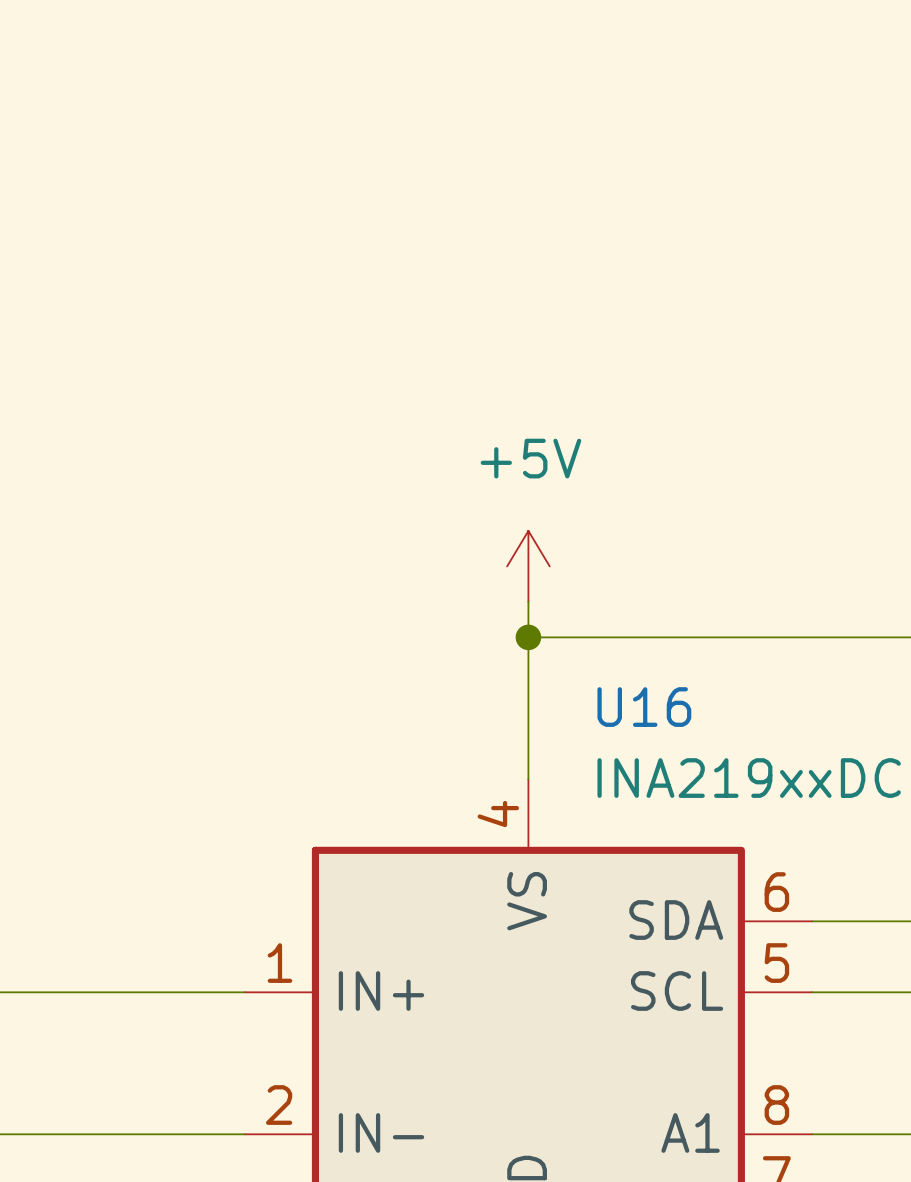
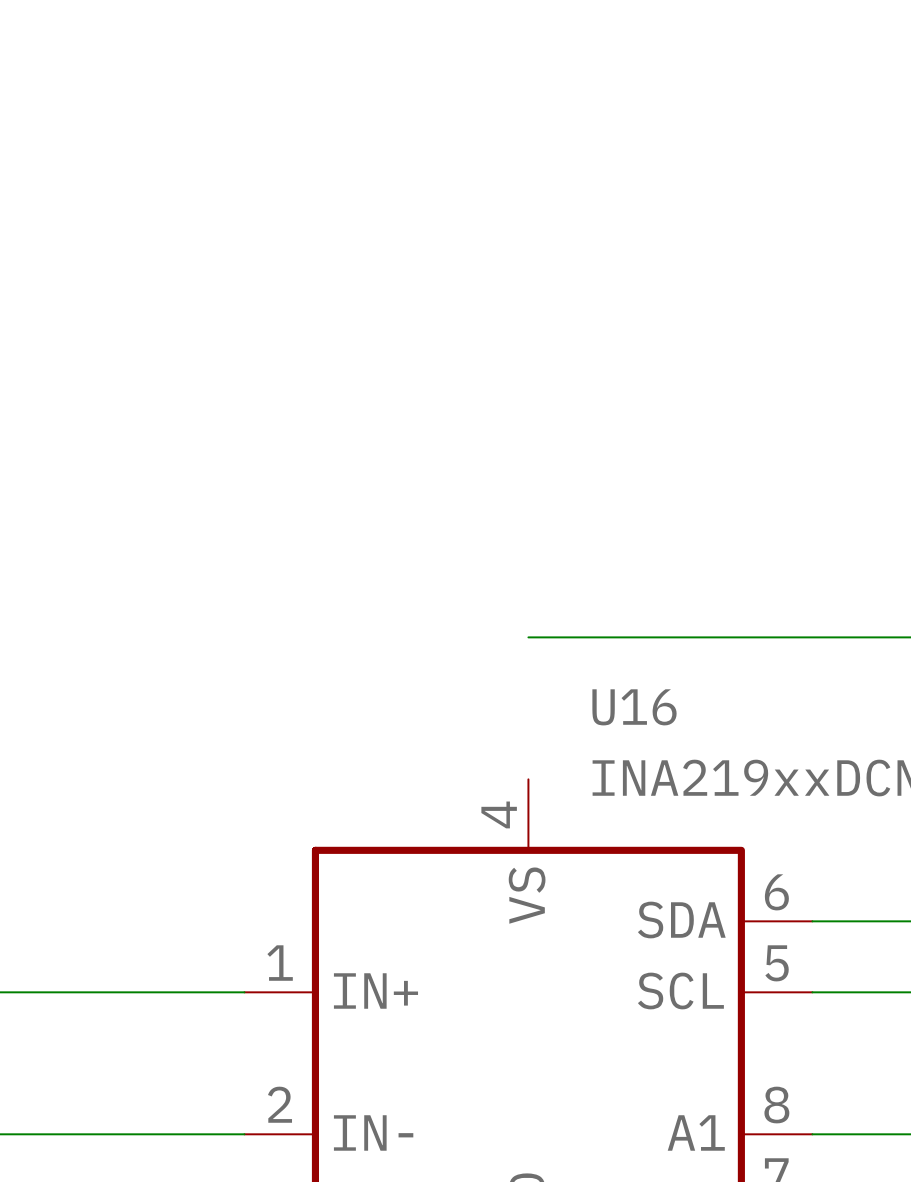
power symbol: +5V (528, 566) -> none
wire: (528, 601) (528, 779) -> none
junction: (528, 637) -> none

